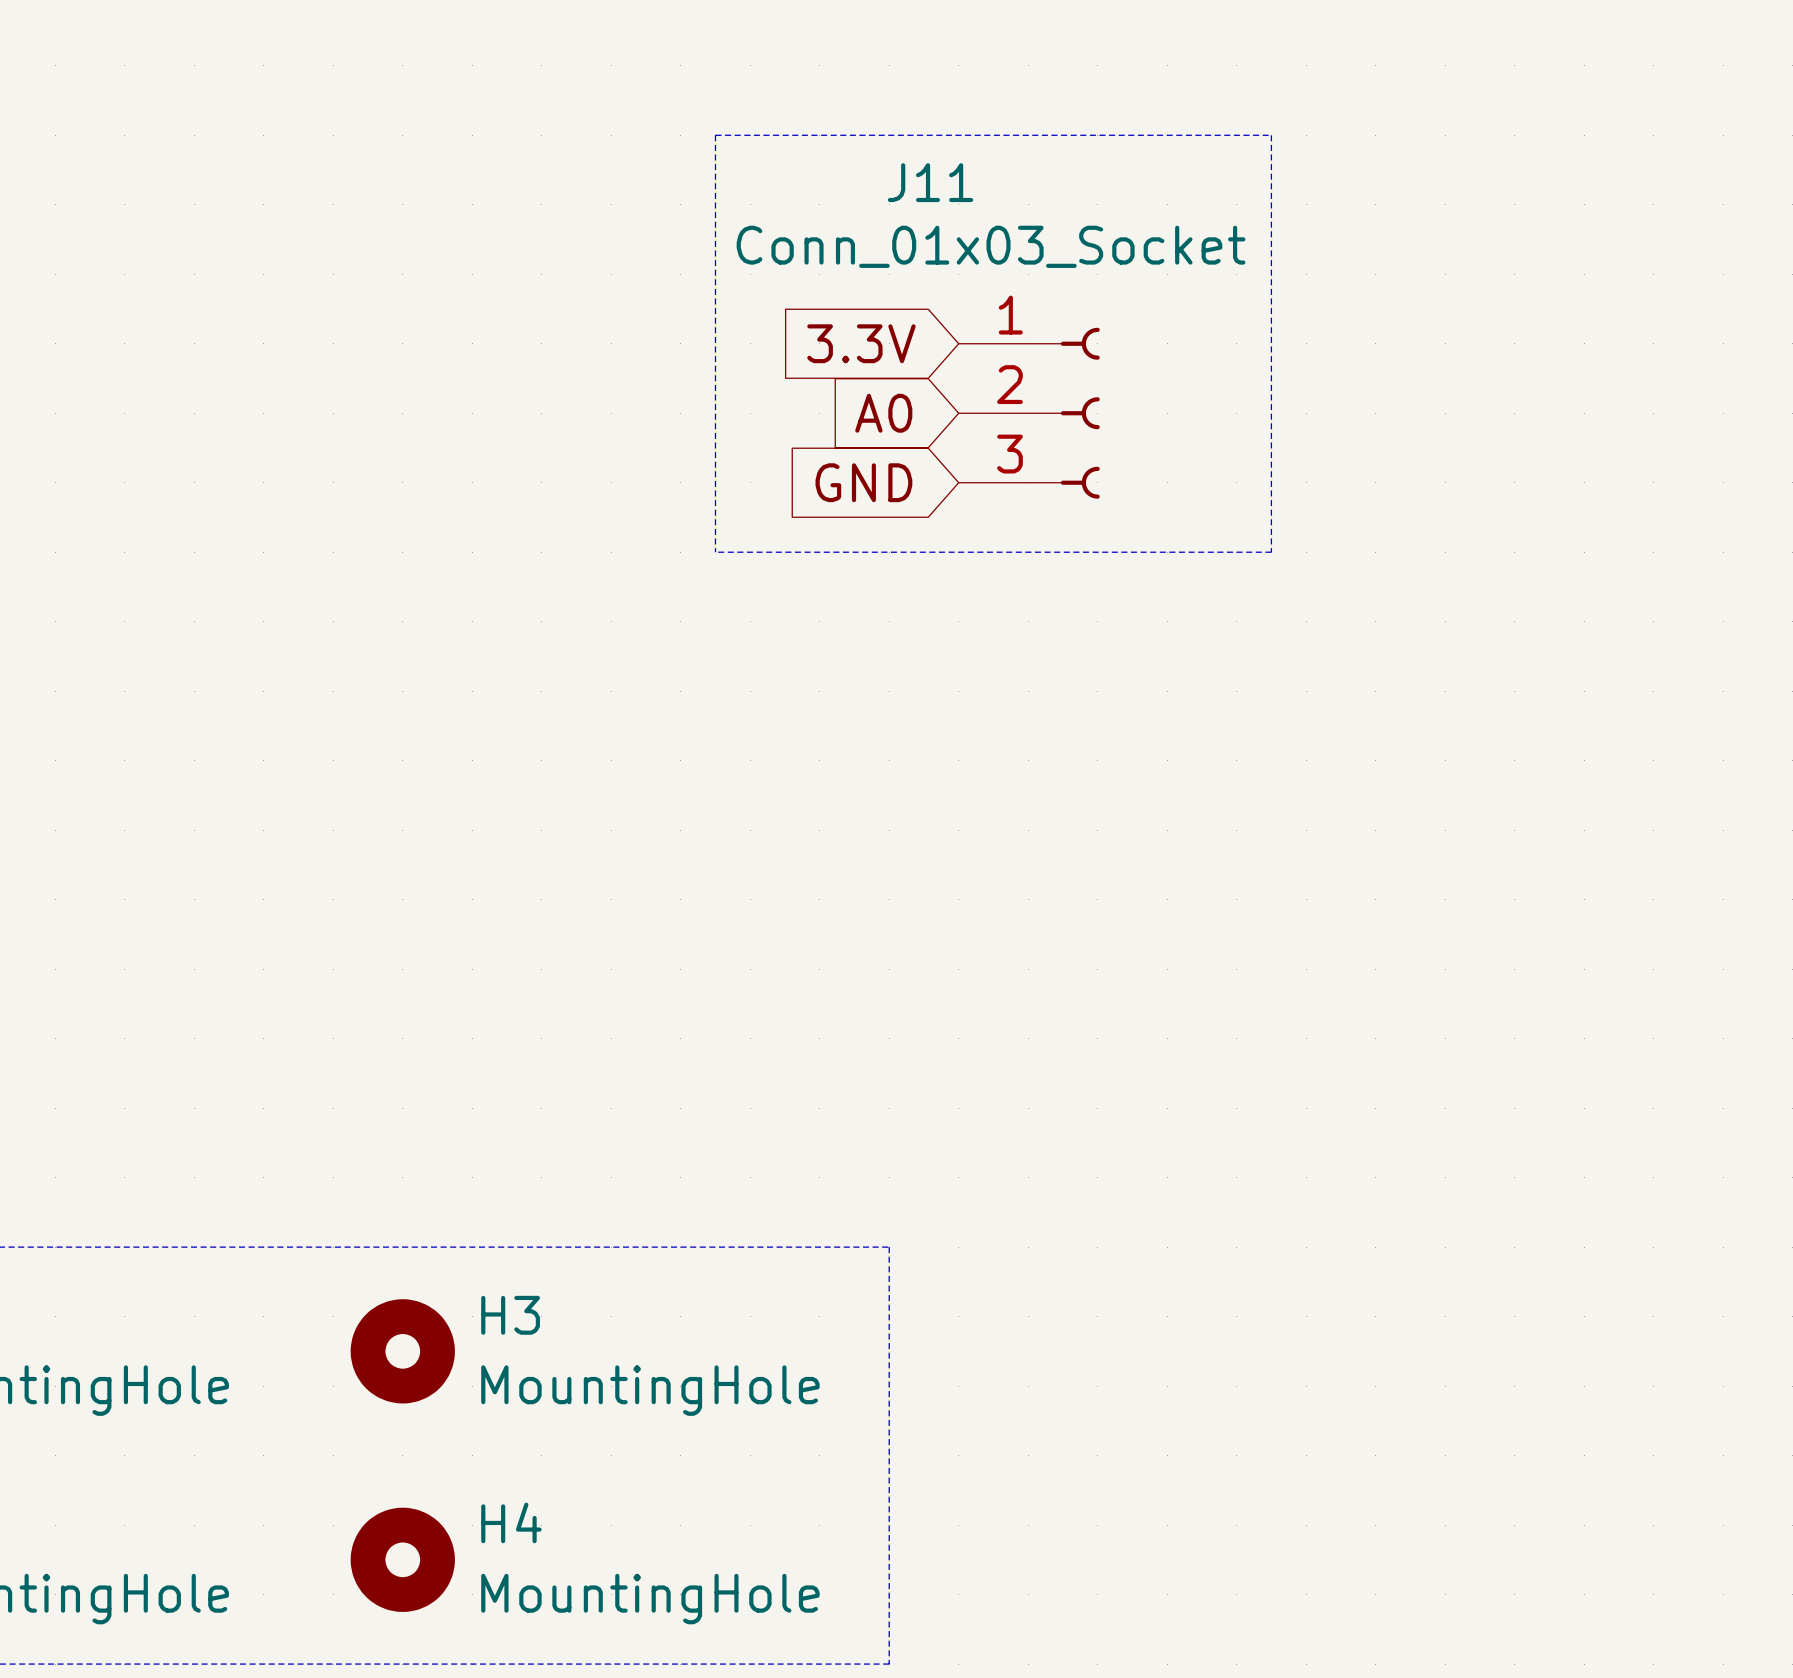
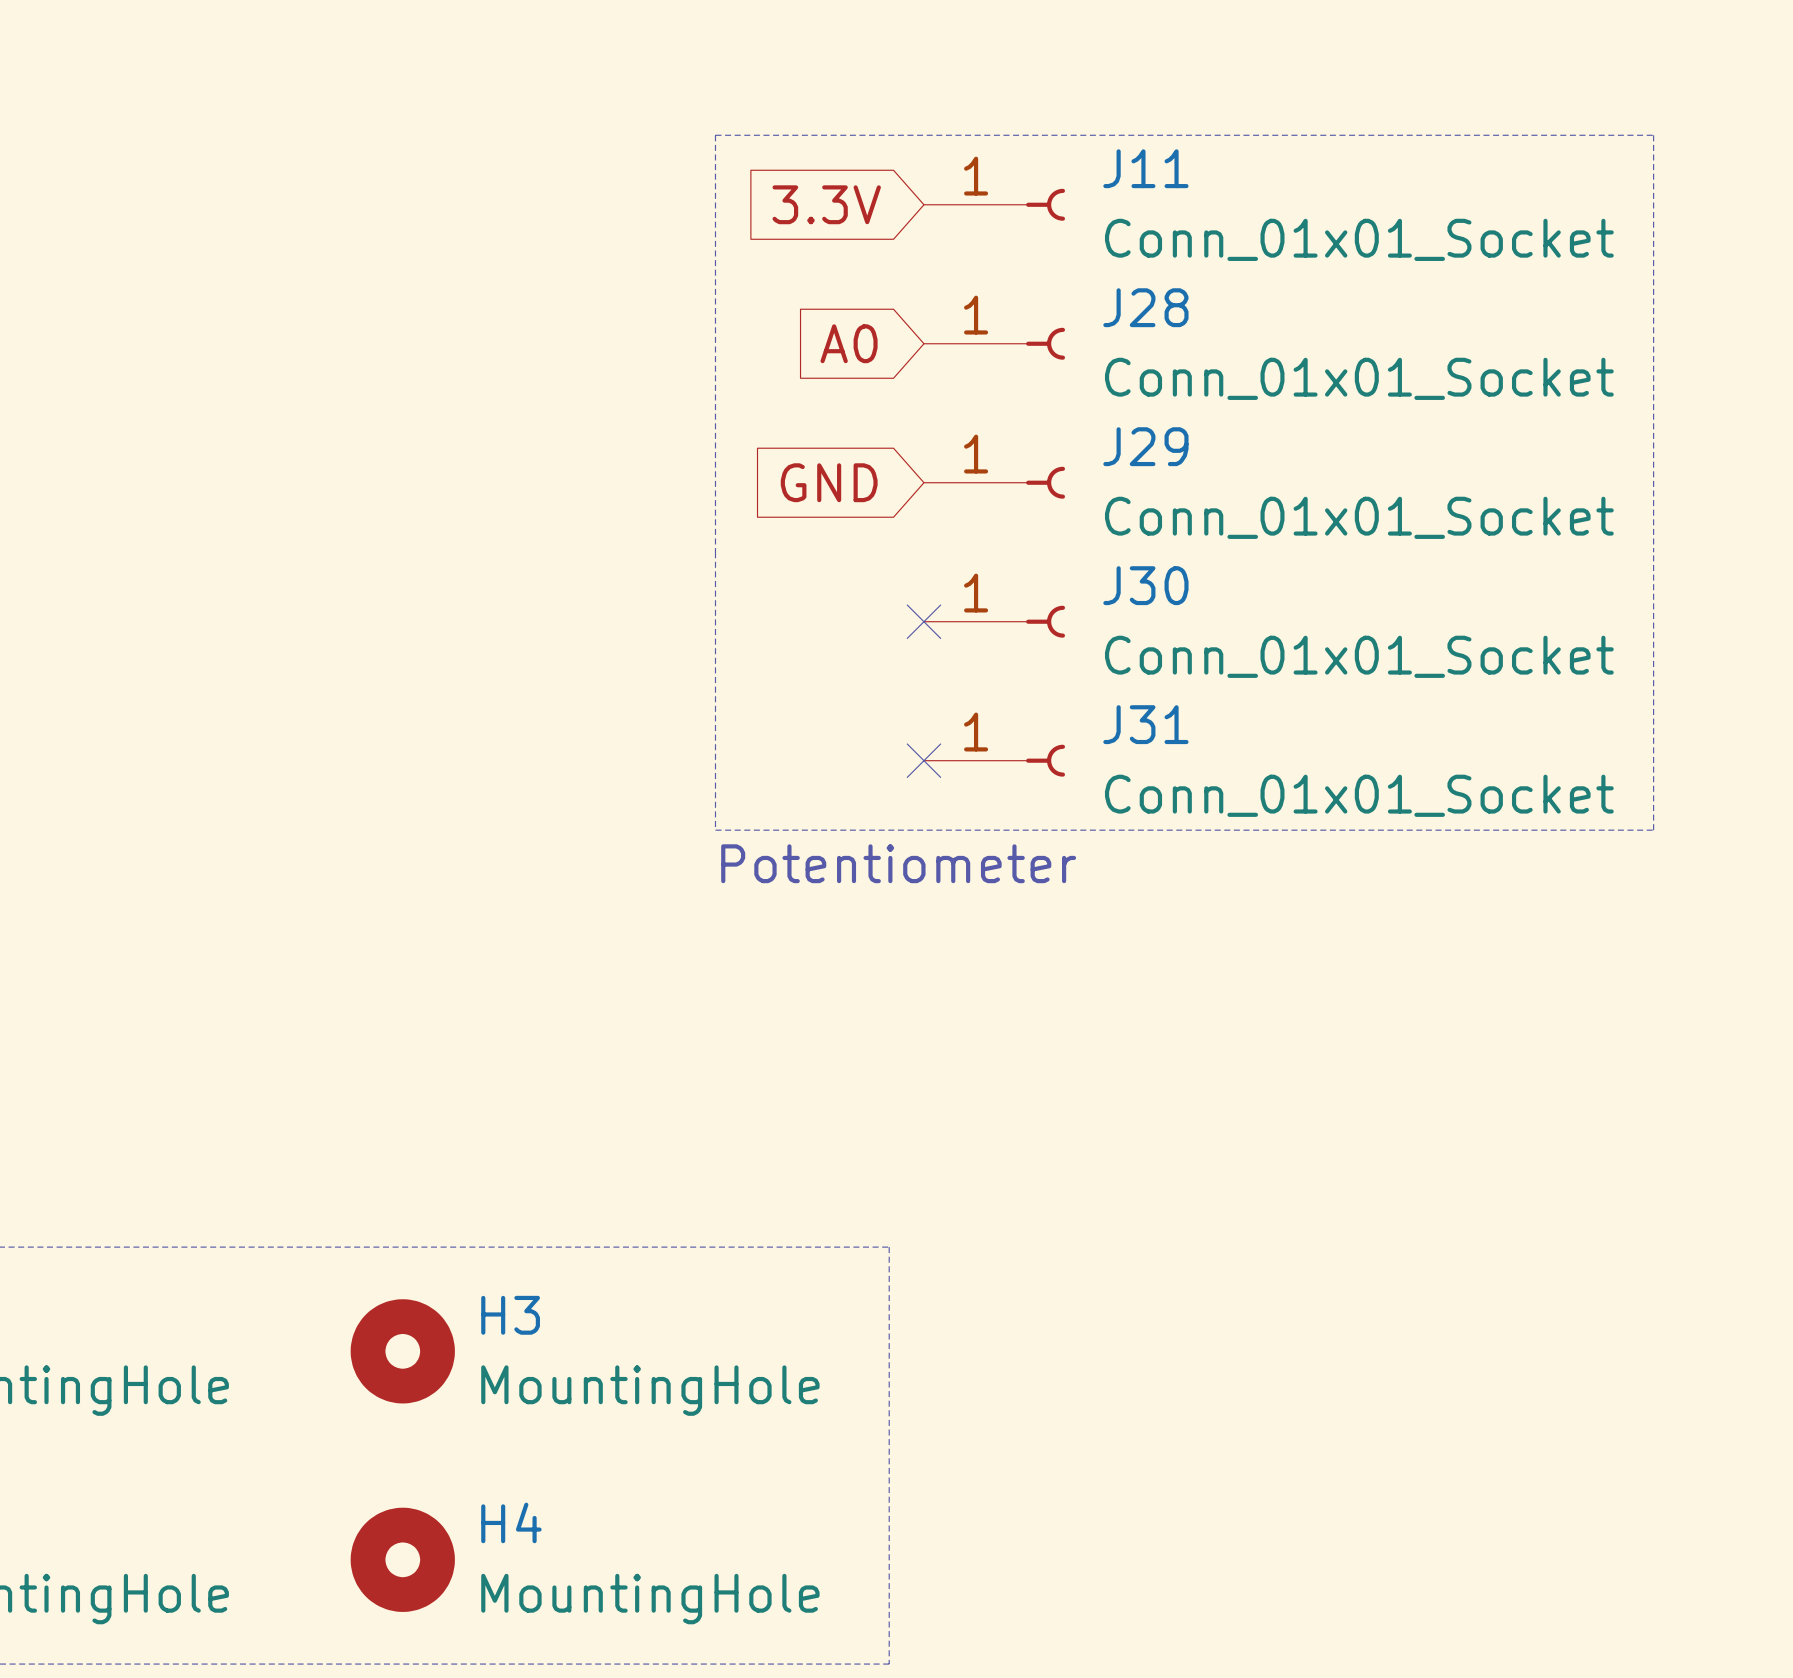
line: (1271, 135) (1271, 552) (715, 552) -> (1271, 135) (1653, 135) (1653, 830) (715, 830) (715, 552)
J11 name position: J11 (930, 182) -> J11 (1145, 168)
J11 value: Conn_01x03_Socket (991, 246) -> Conn_01x01_Socket (1359, 239)
J11 symbol: [958, 327, 1100, 499] -> [923, 188, 1066, 221]
global label position: 3.3V (861, 343) -> 3.3V (826, 204)
J28: none -> Conn_01x01_Socket (994, 343)
global label position: A0 (883, 413) -> A0 (849, 343)
global label position: GND (863, 482) -> GND (829, 482)
J29: none -> Conn_01x01_Socket (994, 482)
no-connect mark: none -> (923, 621)
J30: none -> Conn_01x01_Socket (994, 621)
no-connect mark: none -> (923, 760)
J31: none -> Conn_01x01_Socket (994, 760)
text: none -> Potentiometer (898, 863)

